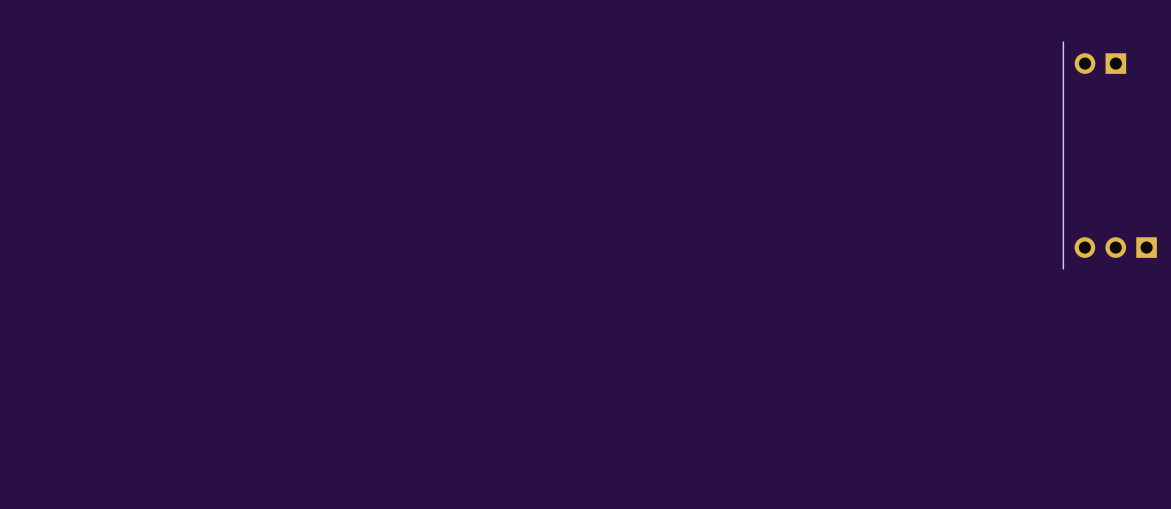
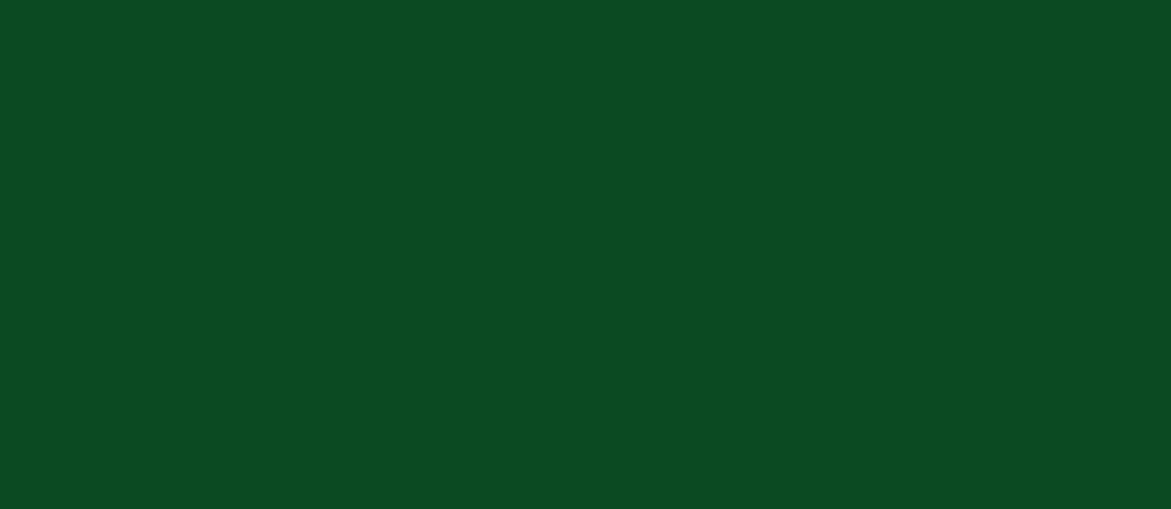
board edge: (1063, 42) (1063, 268) -> none
part: (1100, 63) -> none
part: (1115, 247) -> none

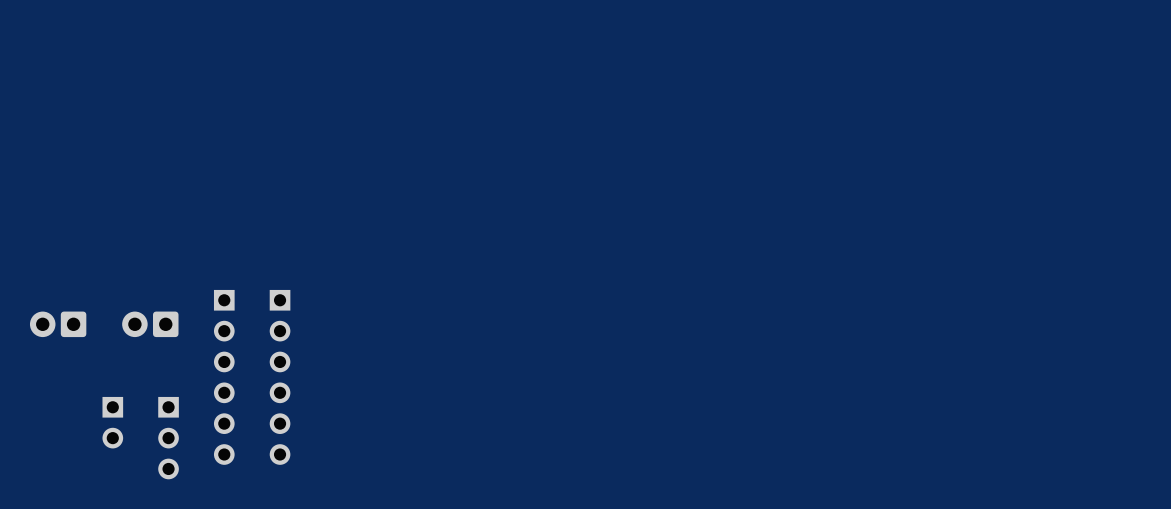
part: none -> (58, 324)
part: none -> (150, 324)
part: none -> (224, 377)
part: none -> (280, 377)
part: none -> (112, 422)
part: none -> (168, 438)

